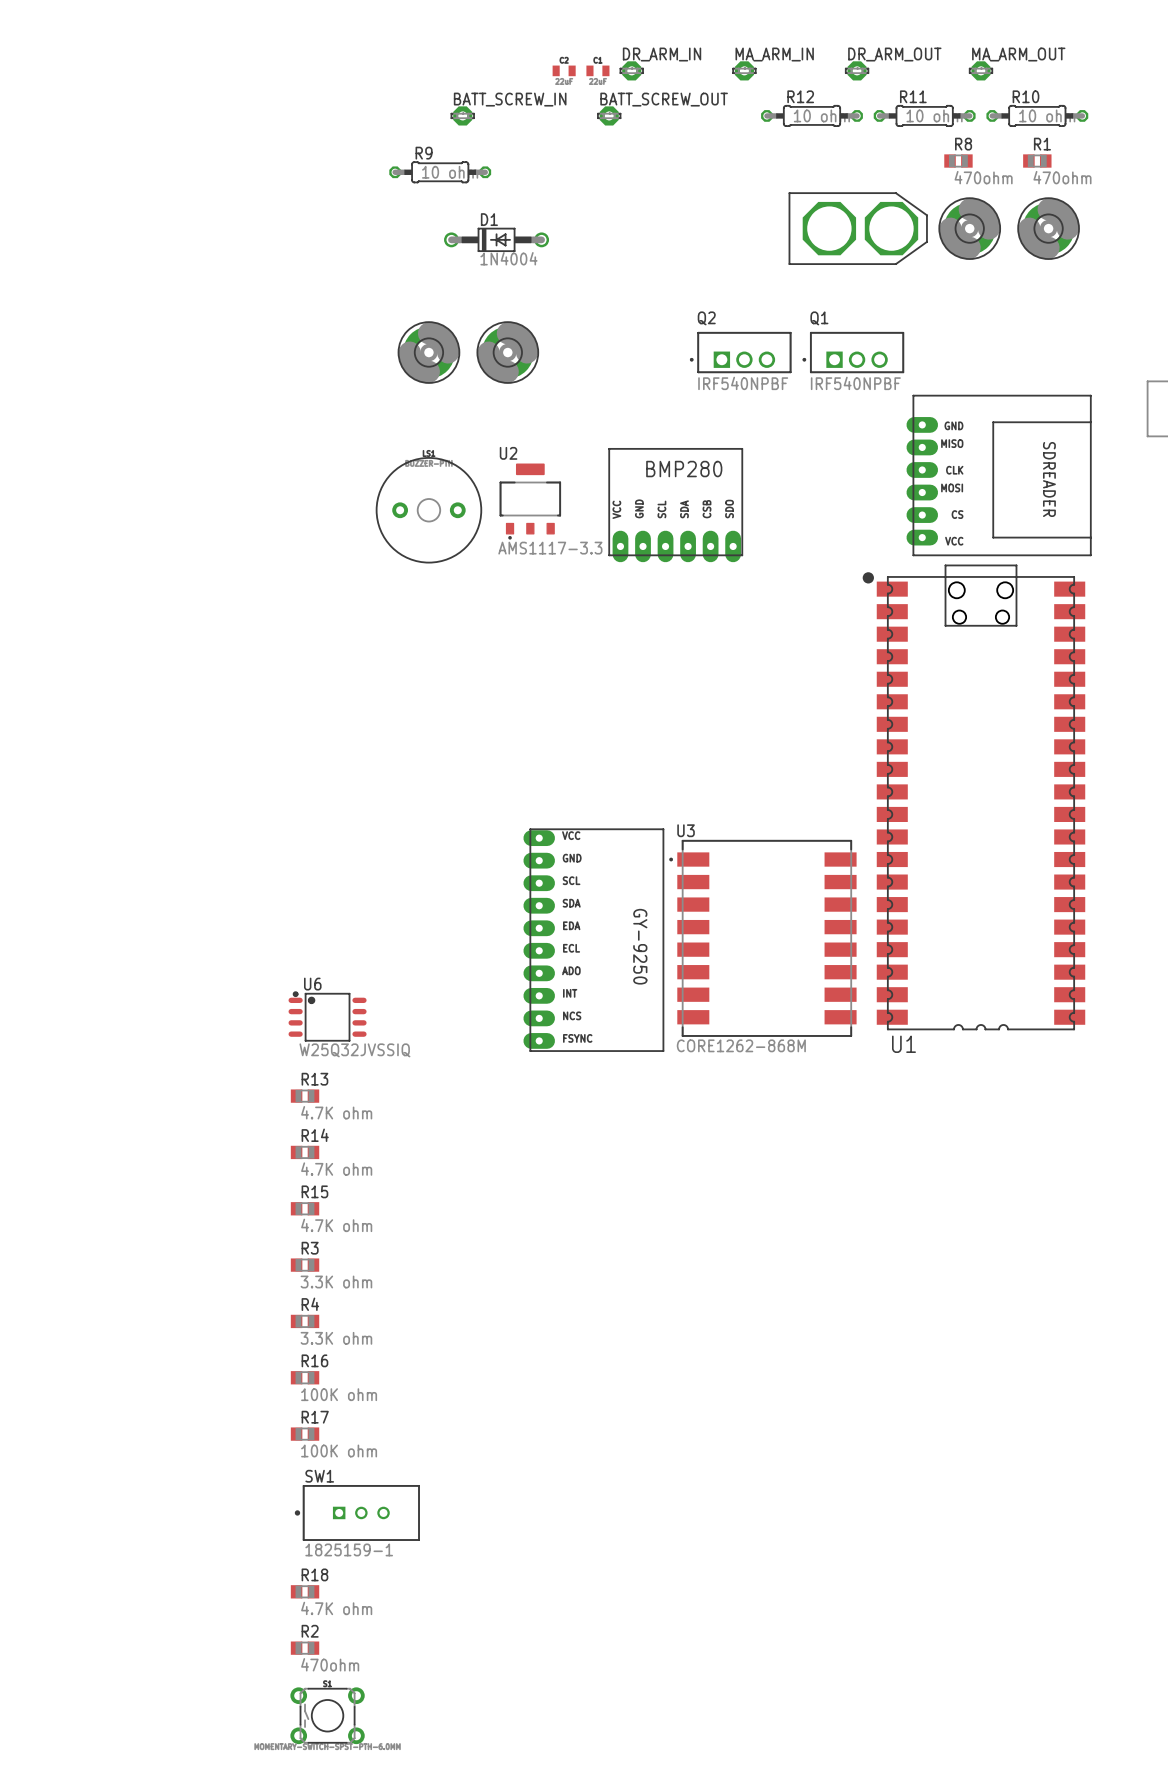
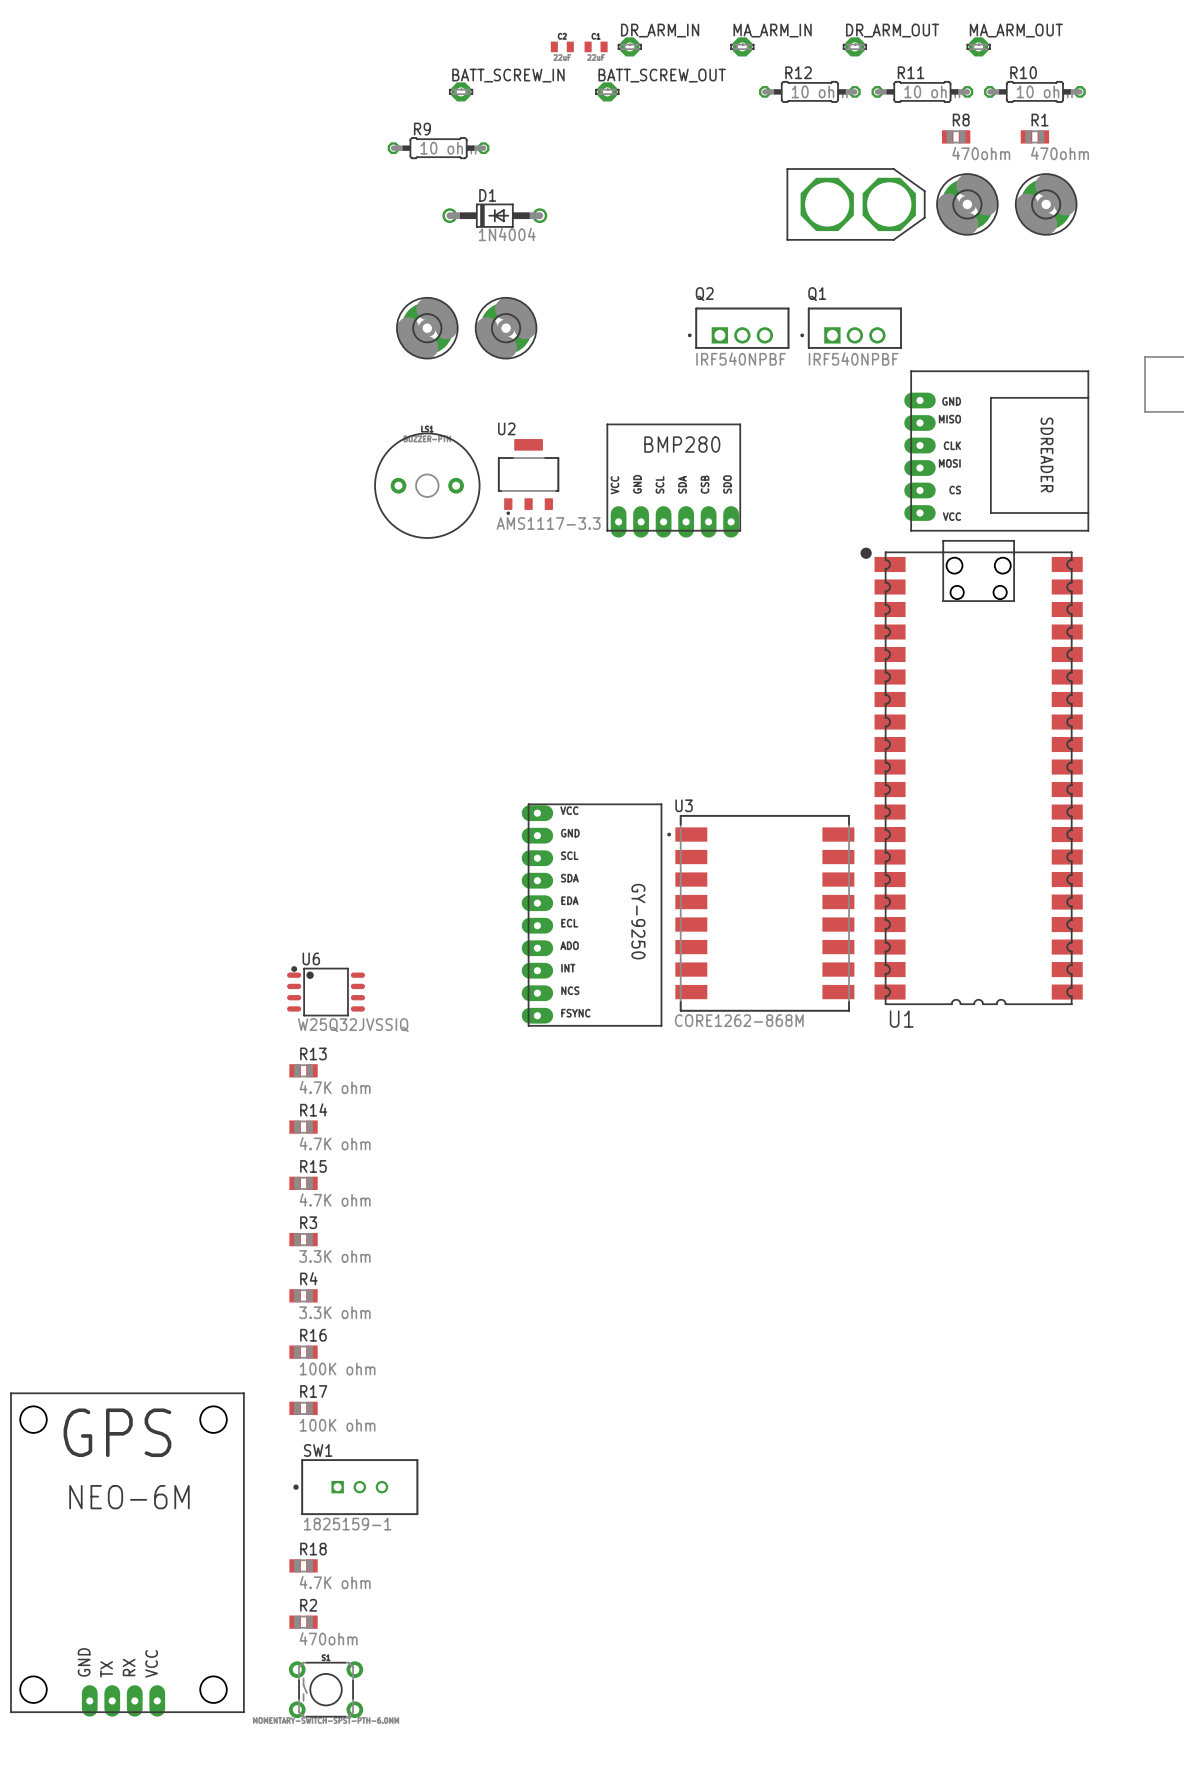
part: none -> (127, 1554)

